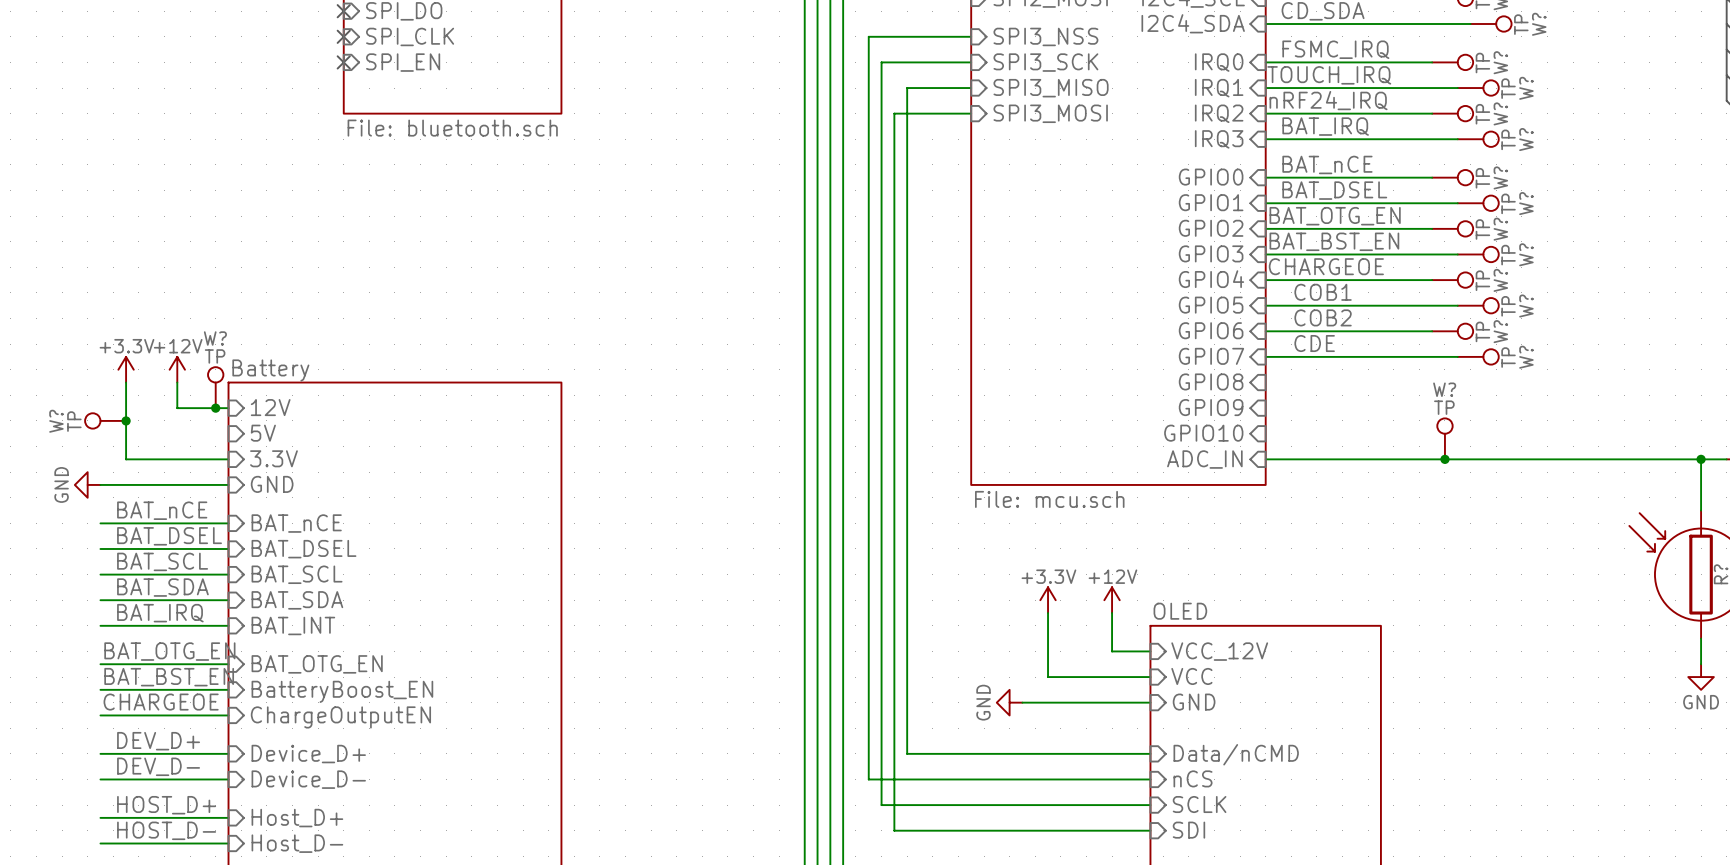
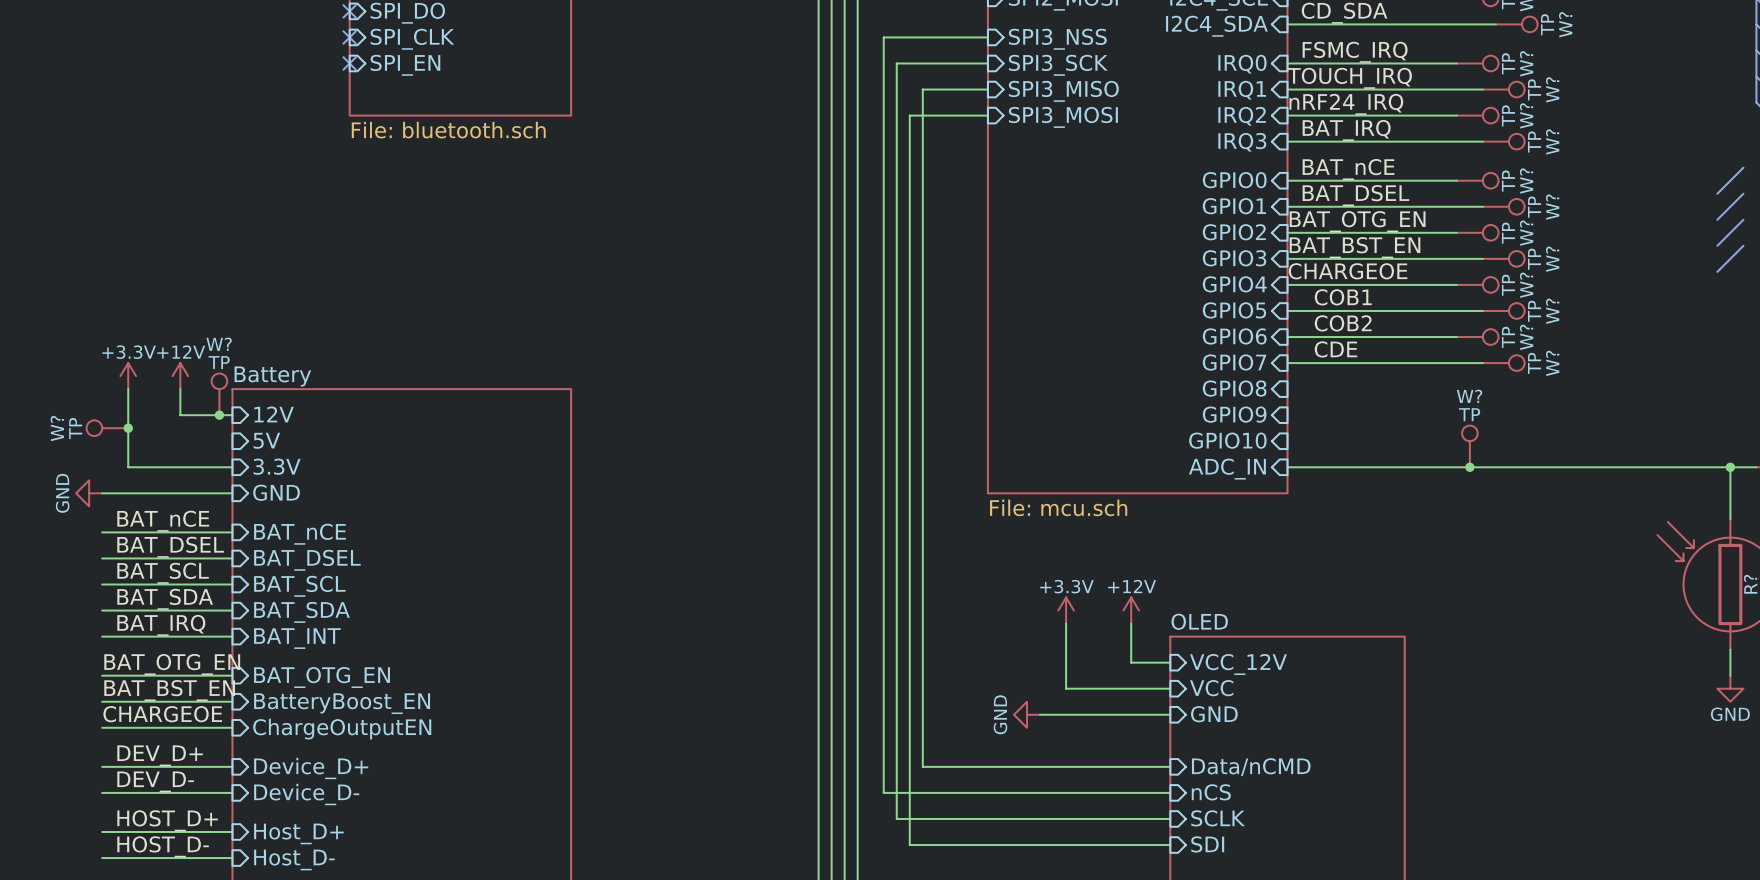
bus: none -> (1743, 167) (1717, 193)
bus: none -> (1743, 193) (1717, 219)
bus: none -> (1743, 219) (1717, 245)
bus: none -> (1743, 245) (1717, 271)

